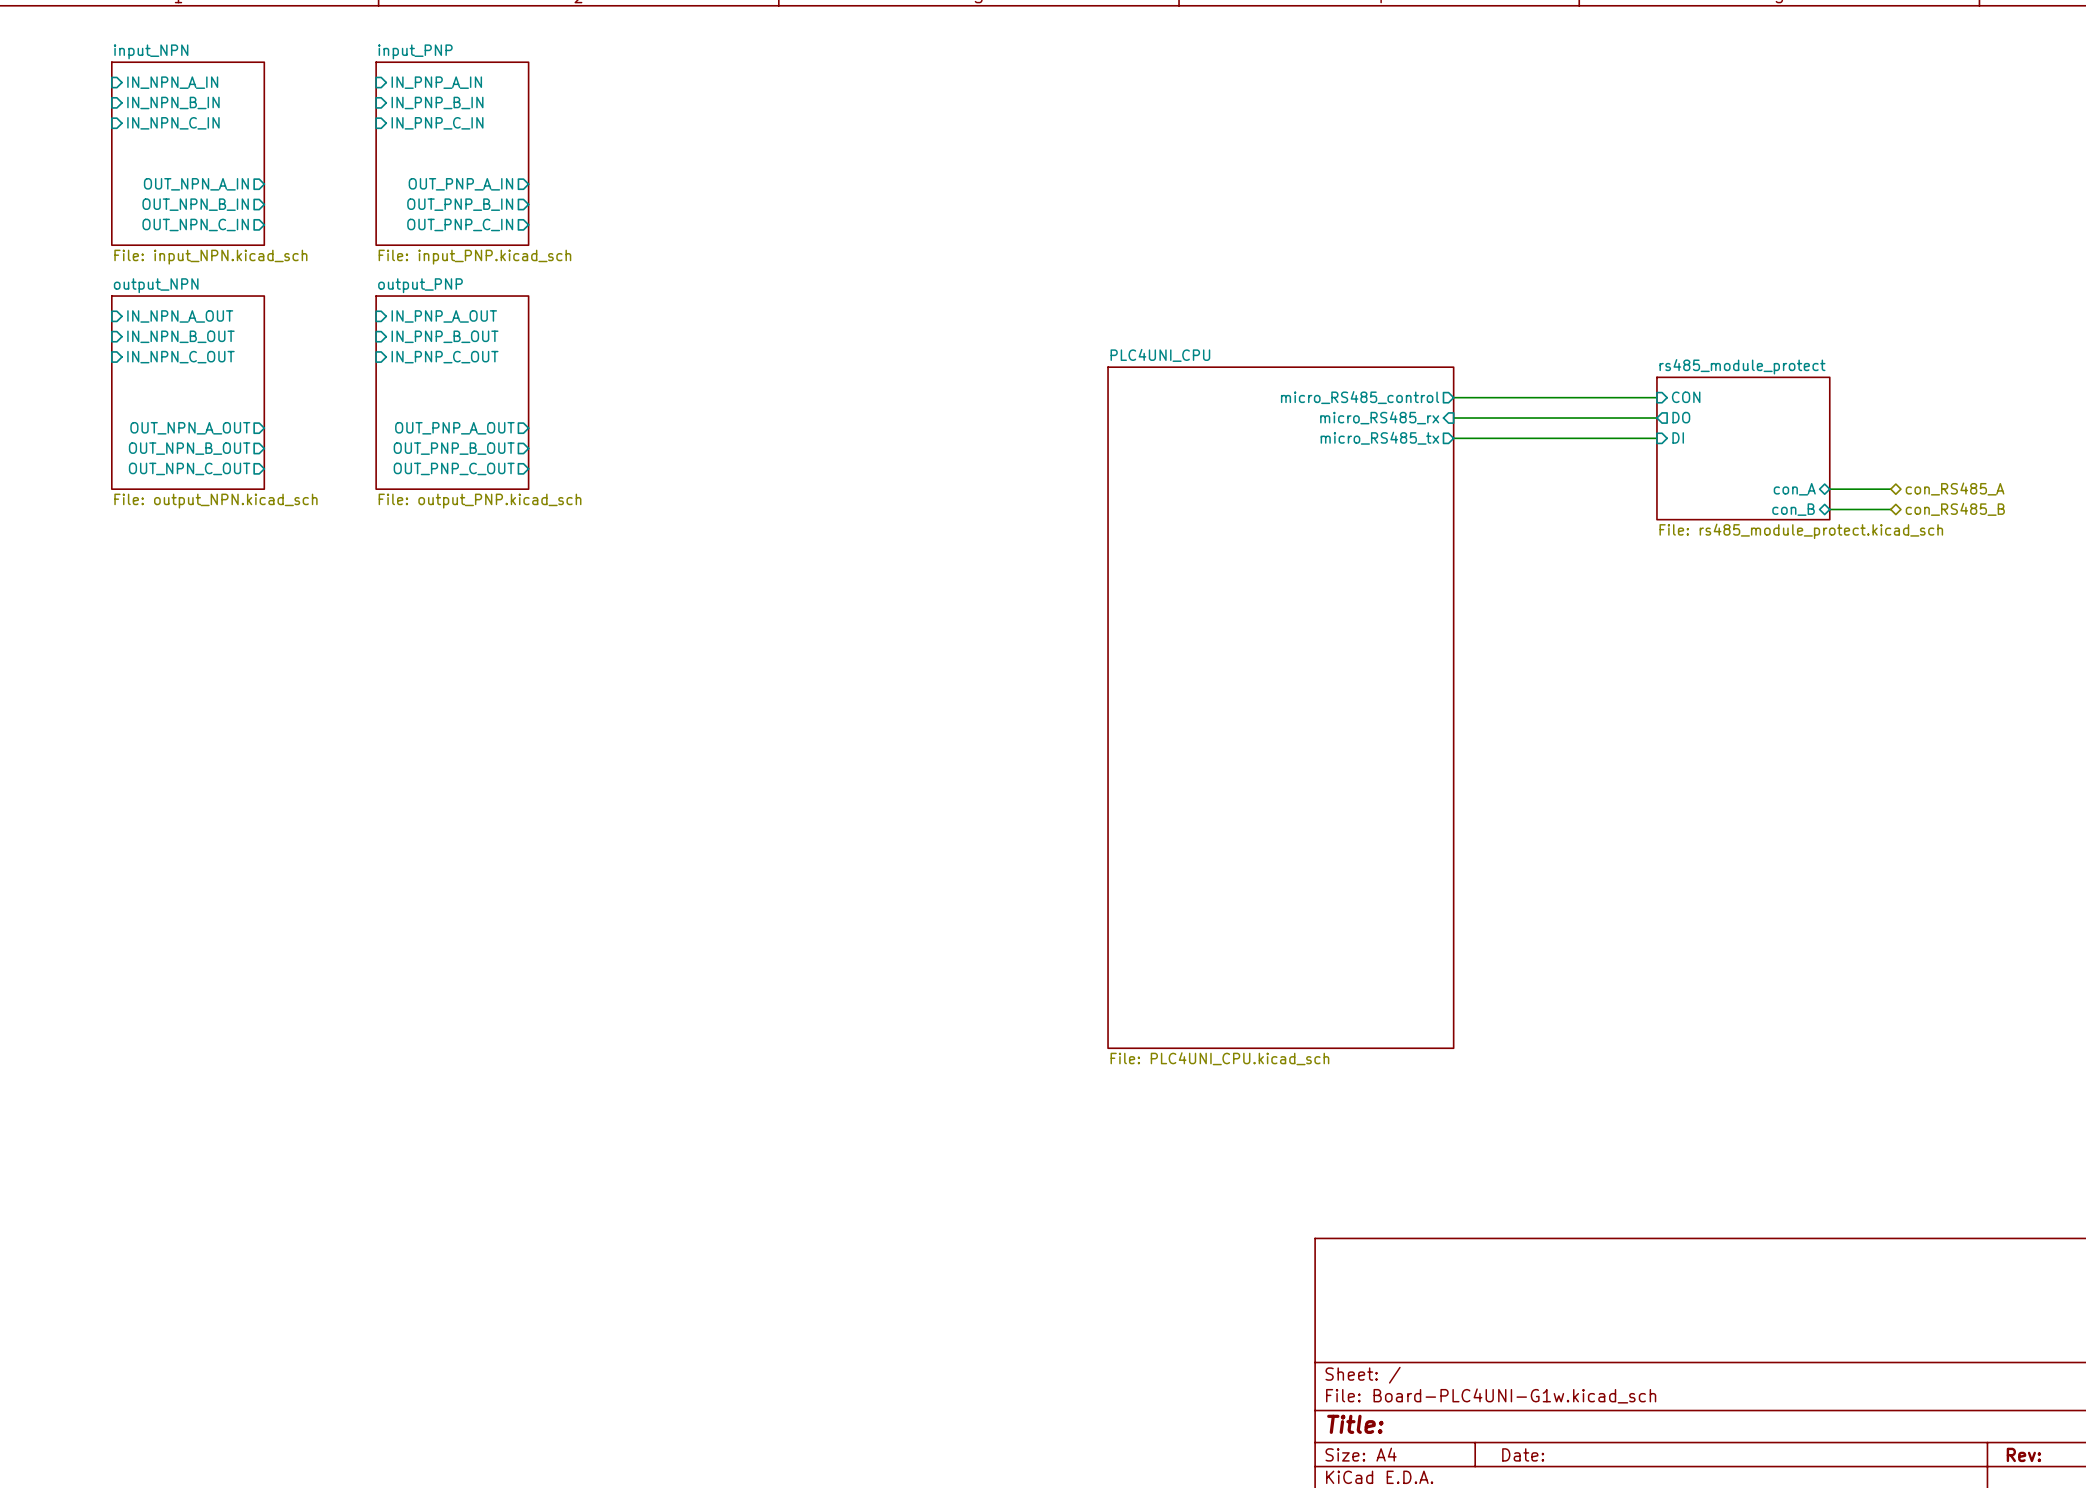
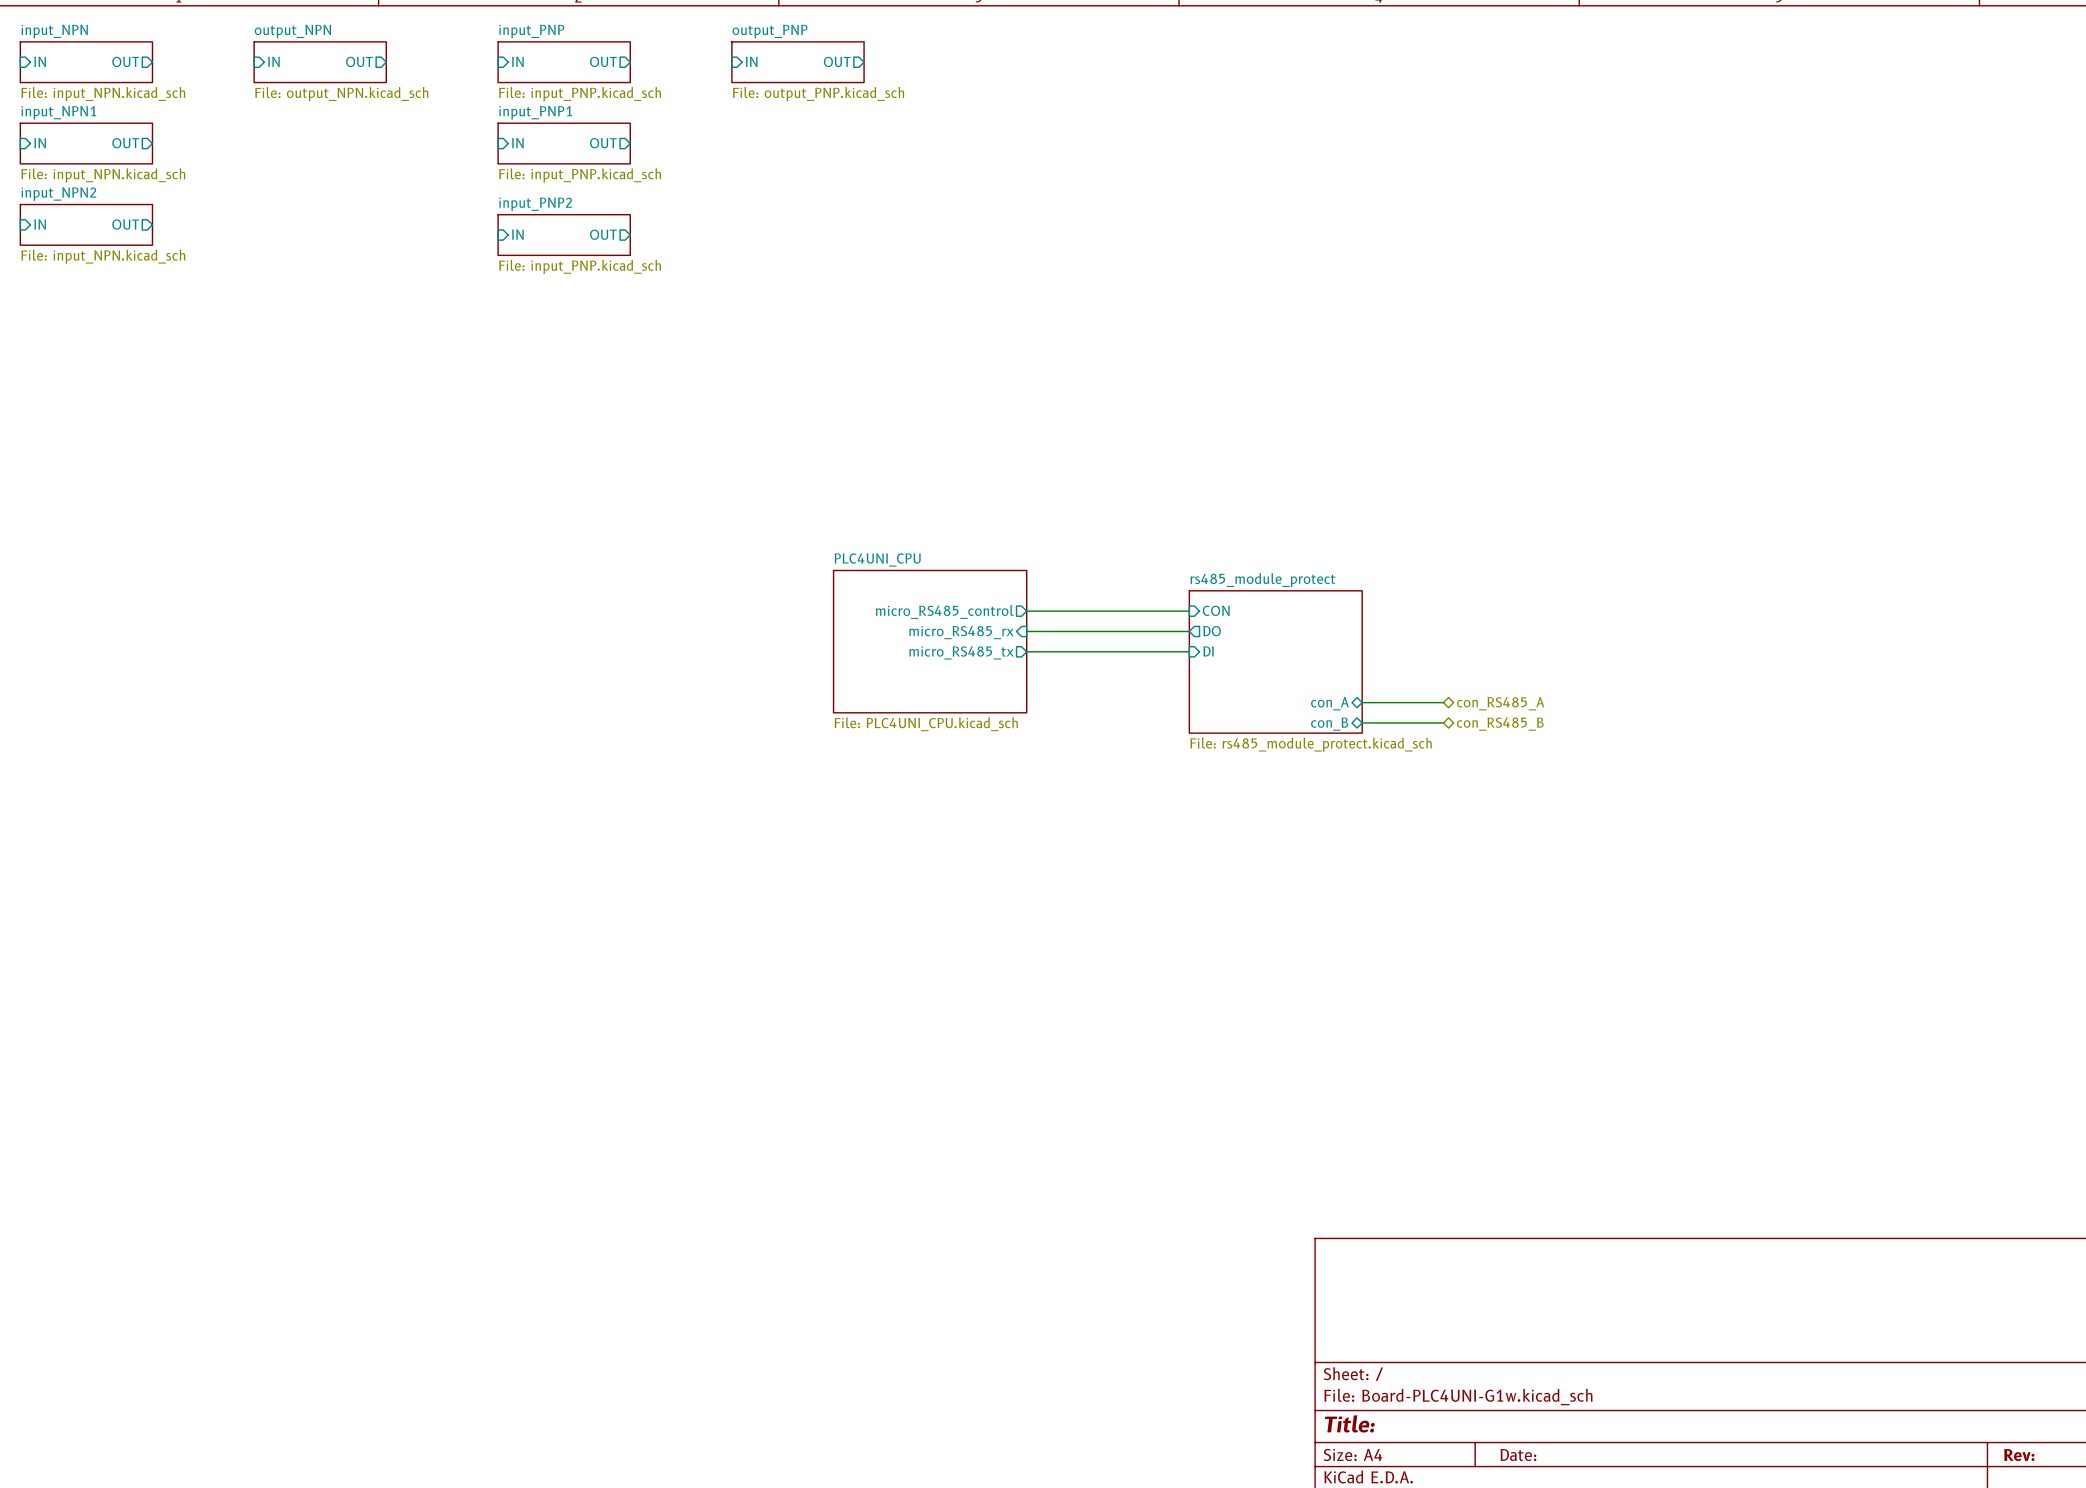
sheet pin: none -> IN (40, 61)
sheet pin: none -> OUT (125, 61)
sheet pin: none -> IN (273, 61)
sheet pin: none -> OUT (359, 61)
sheet pin: none -> IN (517, 61)
sheet pin: none -> OUT (603, 61)
sheet pin: none -> IN (751, 61)
sheet pin: none -> OUT (837, 61)
sheet input_NPN: none -> File: input_NPN.kicad_sch (86, 62)
sheet output_NPN: none -> File: output_NPN.kicad_sch (320, 62)
sheet input_PNP: none -> File: input_PNP.kicad_sch (564, 62)
sheet output_PNP: none -> File: output_PNP.kicad_sch (797, 62)
sheet pin: IN_NPN_A_IN (172, 82) -> none
sheet pin: IN_PNP_A_IN (436, 82) -> none
sheet pin: IN_NPN_B_IN (173, 102) -> none
sheet pin: IN_PNP_B_IN (437, 102) -> none
sheet pin: IN_NPN_C_IN (173, 123) -> none
sheet pin: IN_PNP_C_IN (437, 123) -> none
sheet pin: none -> IN (40, 143)
sheet input_NPN1: none -> File: input_NPN.kicad_sch (86, 143)
sheet pin: none -> OUT (125, 143)
sheet pin: none -> IN (517, 143)
sheet input_PNP1: none -> File: input_PNP.kicad_sch (564, 143)
sheet pin: none -> OUT (603, 143)
sheet input_NPN: File: input_NPN.kicad_sch (188, 153) -> none
sheet input_PNP: File: input_PNP.kicad_sch (452, 153) -> none
sheet pin: OUT_NPN_A_IN (196, 184) -> none
sheet pin: OUT_PNP_A_IN (460, 184) -> none
sheet pin: OUT_NPN_B_IN (195, 204) -> none
sheet pin: OUT_PNP_B_IN (460, 204) -> none
sheet pin: none -> IN (40, 224)
sheet input_NPN2: none -> File: input_NPN.kicad_sch (86, 224)
sheet pin: none -> OUT (125, 224)
sheet pin: OUT_NPN_C_IN (195, 224) -> none
sheet pin: OUT_PNP_C_IN (460, 224) -> none
sheet pin: none -> IN (517, 234)
sheet pin: none -> OUT (603, 234)
sheet input_PNP2: none -> File: input_PNP.kicad_sch (564, 235)
sheet pin: IN_NPN_A_OUT (180, 316) -> none
sheet pin: IN_PNP_A_OUT (444, 316) -> none
sheet pin: IN_NPN_B_OUT (180, 336) -> none
sheet pin: IN_PNP_B_OUT (445, 336) -> none
sheet PLC4UNI_CPU name position: PLC4UNI_CPU (1160, 355) -> PLC4UNI_CPU (877, 559)
sheet pin: IN_NPN_C_OUT (180, 357) -> none
sheet pin: IN_PNP_C_OUT (445, 357) -> none
sheet PLC4UNI_CPU shape: [1107, 366, 1455, 1049] -> [832, 569, 1028, 714]
sheet output_NPN: File: output_NPN.kicad_sch (188, 392) -> none
sheet output_PNP: File: output_PNP.kicad_sch (452, 392) -> none
sheet pin: micro_RS485_control (1360, 397) -> none
wire: (1453, 397) (1656, 397) -> none
sheet pin: CON (1686, 397) -> none
sheet pin: micro_RS485_rx (1379, 417) -> none
sheet pin: DO (1681, 417) -> none
wire: (1453, 418) (1656, 418) -> none
sheet pin: OUT_NPN_A_OUT (190, 428) -> none
sheet pin: OUT_PNP_A_OUT (454, 428) -> none
sheet pin: DI (1678, 437) -> none
sheet pin: micro_RS485_tx (1379, 438) -> none
wire: (1453, 438) (1656, 438) -> none
sheet pin: OUT_NPN_B_OUT (189, 448) -> none
sheet pin: OUT_PNP_B_OUT (454, 448) -> none
sheet rs485_module_protect position: (1743, 448) -> (1275, 661)
sheet pin: OUT_NPN_C_OUT (189, 468) -> none
sheet pin: OUT_PNP_C_OUT (454, 468) -> none
sheet pin: con_A (1794, 489) -> none
wire: (1829, 489) (1890, 489) -> none
hierarchical label: con_RS485_A (1955, 489) -> none
sheet pin: con_B (1793, 509) -> none
wire: (1829, 509) (1890, 509) -> none
hierarchical label: con_RS485_B (1955, 509) -> none
sheet pin: none -> CON (1216, 610)
sheet pin: none -> micro_RS485_control (944, 611)
wire: none -> (1026, 611) (1189, 611)
sheet pin: none -> micro_RS485_rx (961, 632)
wire: none -> (1026, 631) (1189, 631)
sheet pin: none -> DO (1212, 631)
sheet pin: none -> micro_RS485_tx (961, 652)
wire: none -> (1026, 651) (1189, 651)
sheet pin: none -> DI (1208, 651)
sheet pin: none -> con_A (1329, 703)
wire: none -> (1362, 702) (1443, 702)
hierarchical label: none -> con_RS485_A (1500, 703)
wire: none -> (1362, 722) (1443, 722)
hierarchical label: none -> con_RS485_B (1500, 724)
sheet pin: none -> con_B (1329, 724)
sheet PLC4UNI_CPU value position: File: PLC4UNI_CPU.kicad_sch (1219, 1058) -> File: PLC4UNI_CPU.kicad_sch (926, 724)

